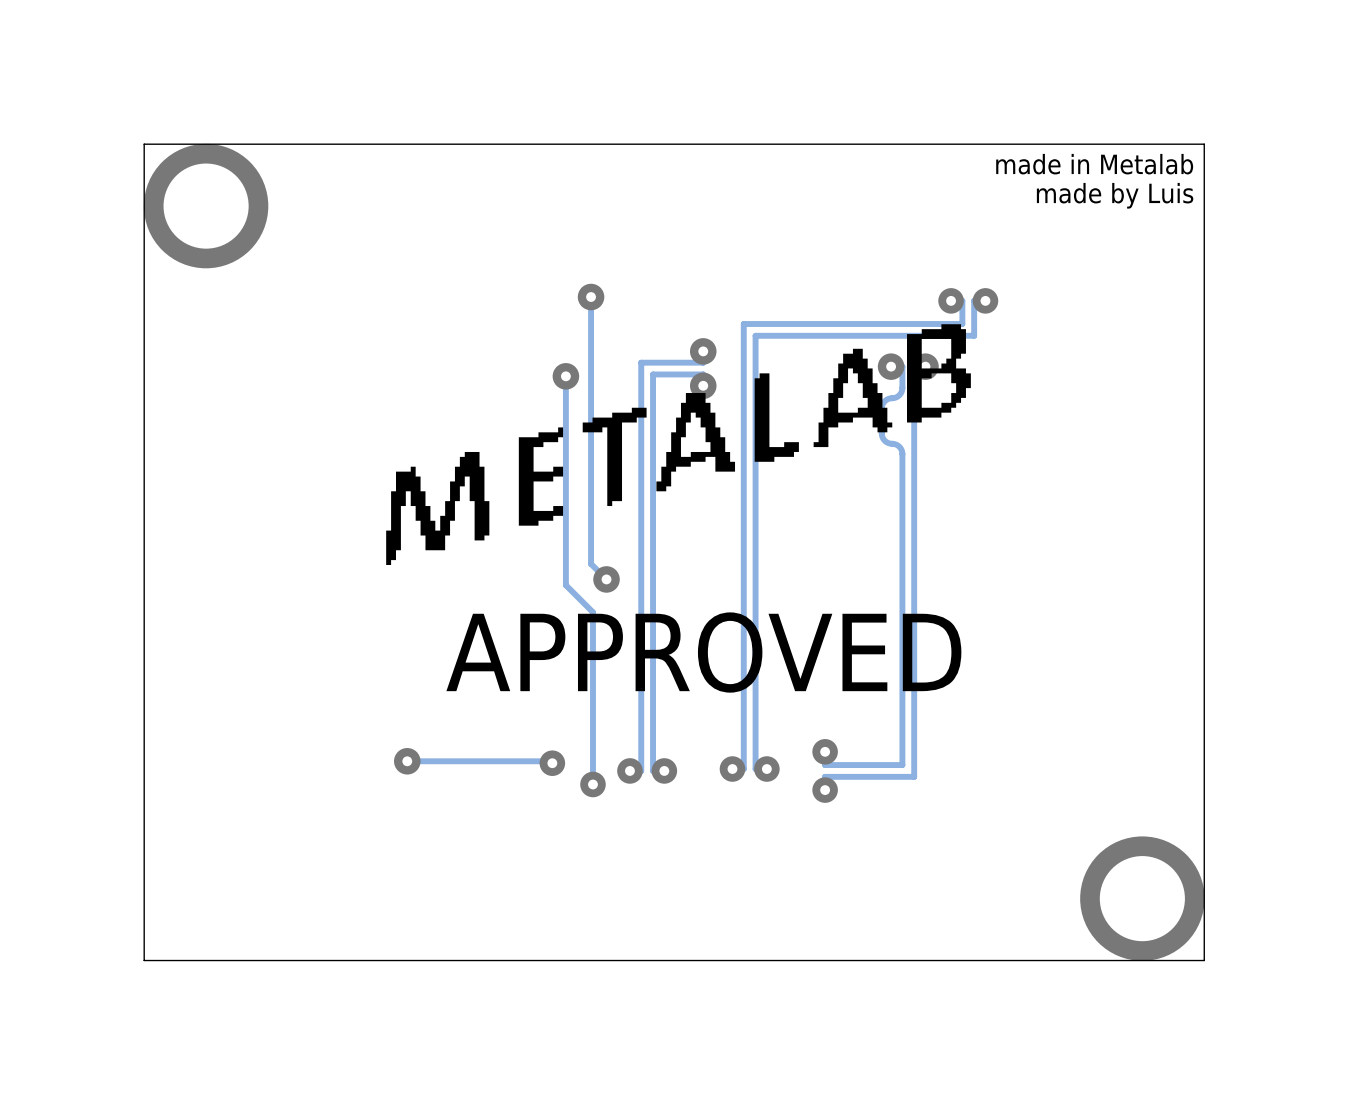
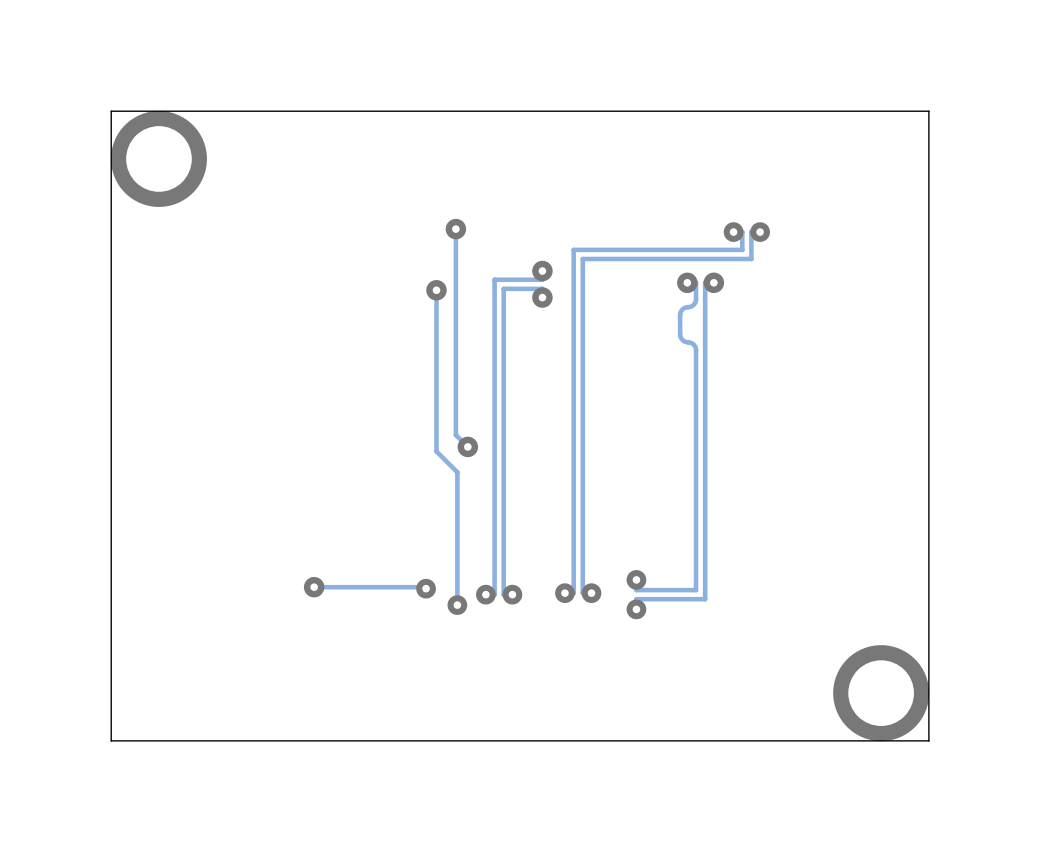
text: made in Metalab (1094, 164) -> none
text: made by Luis (1115, 195) -> none
drawing: [386, 324, 971, 565] -> none
text: APPROVED (703, 652) -> none

